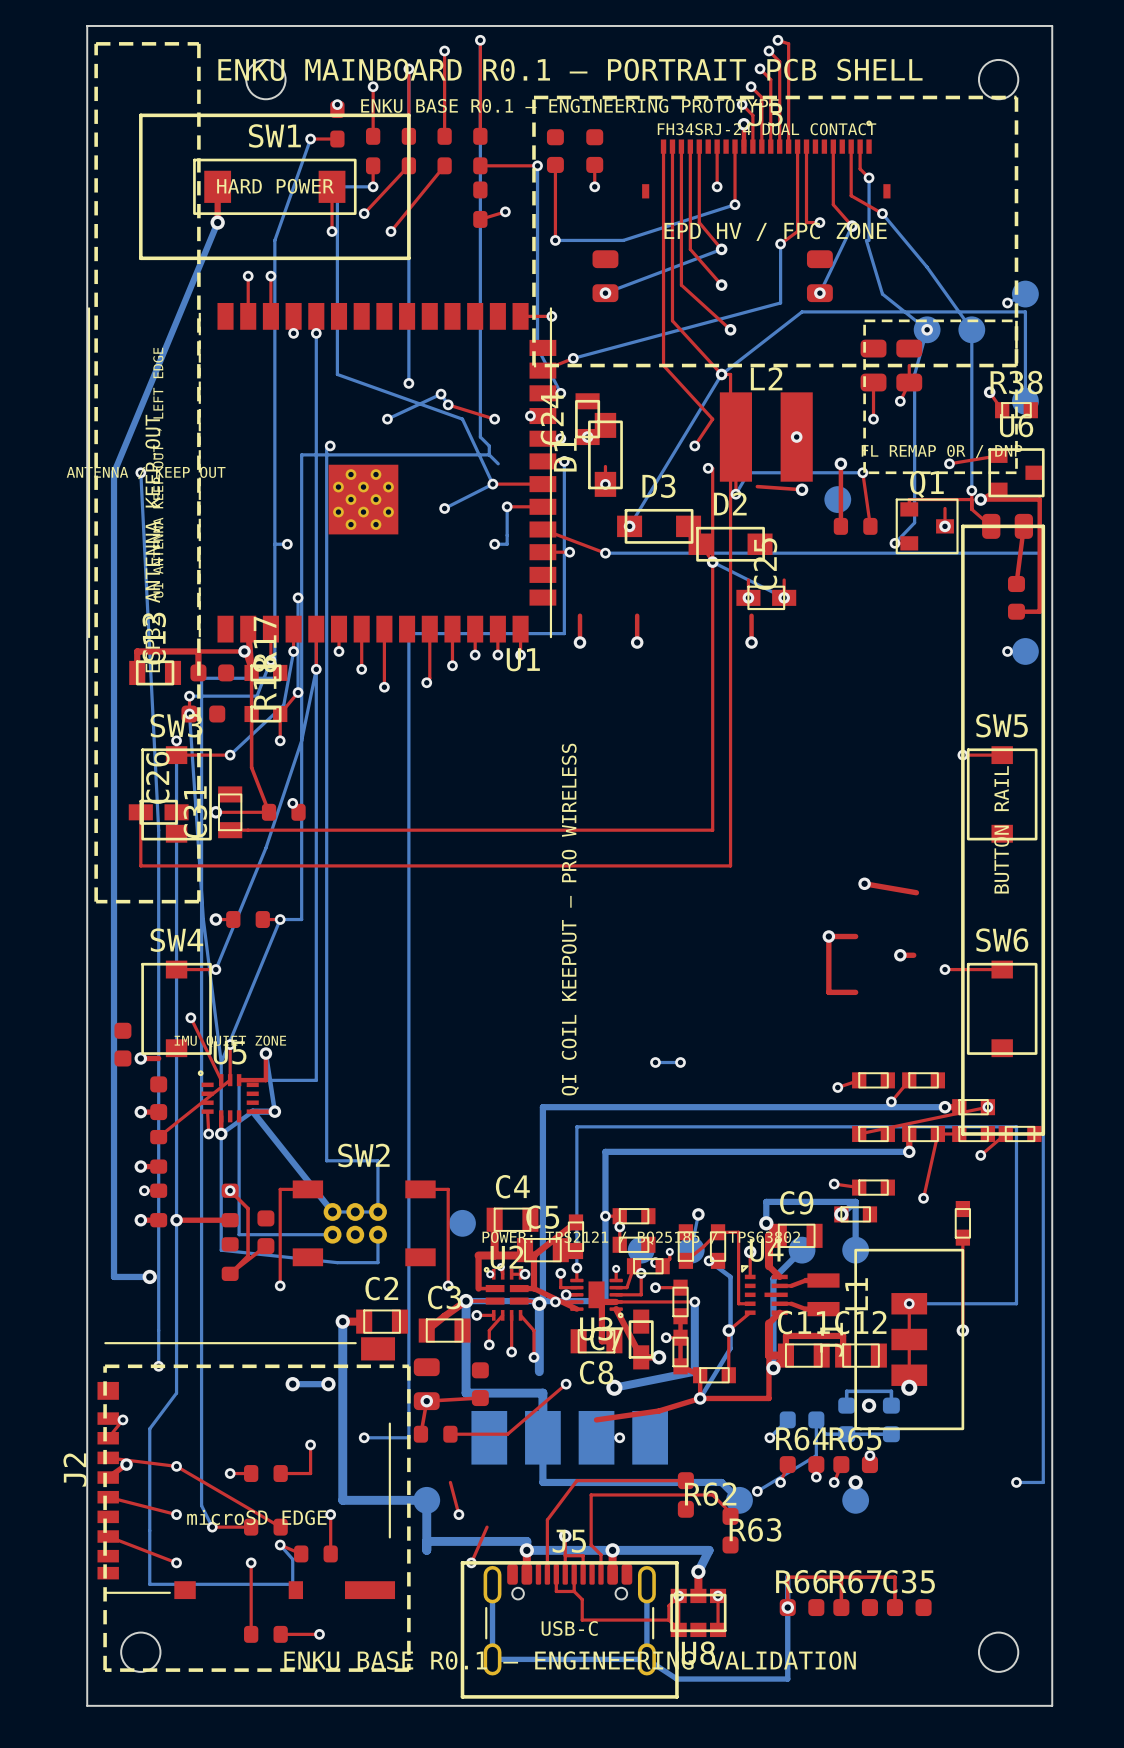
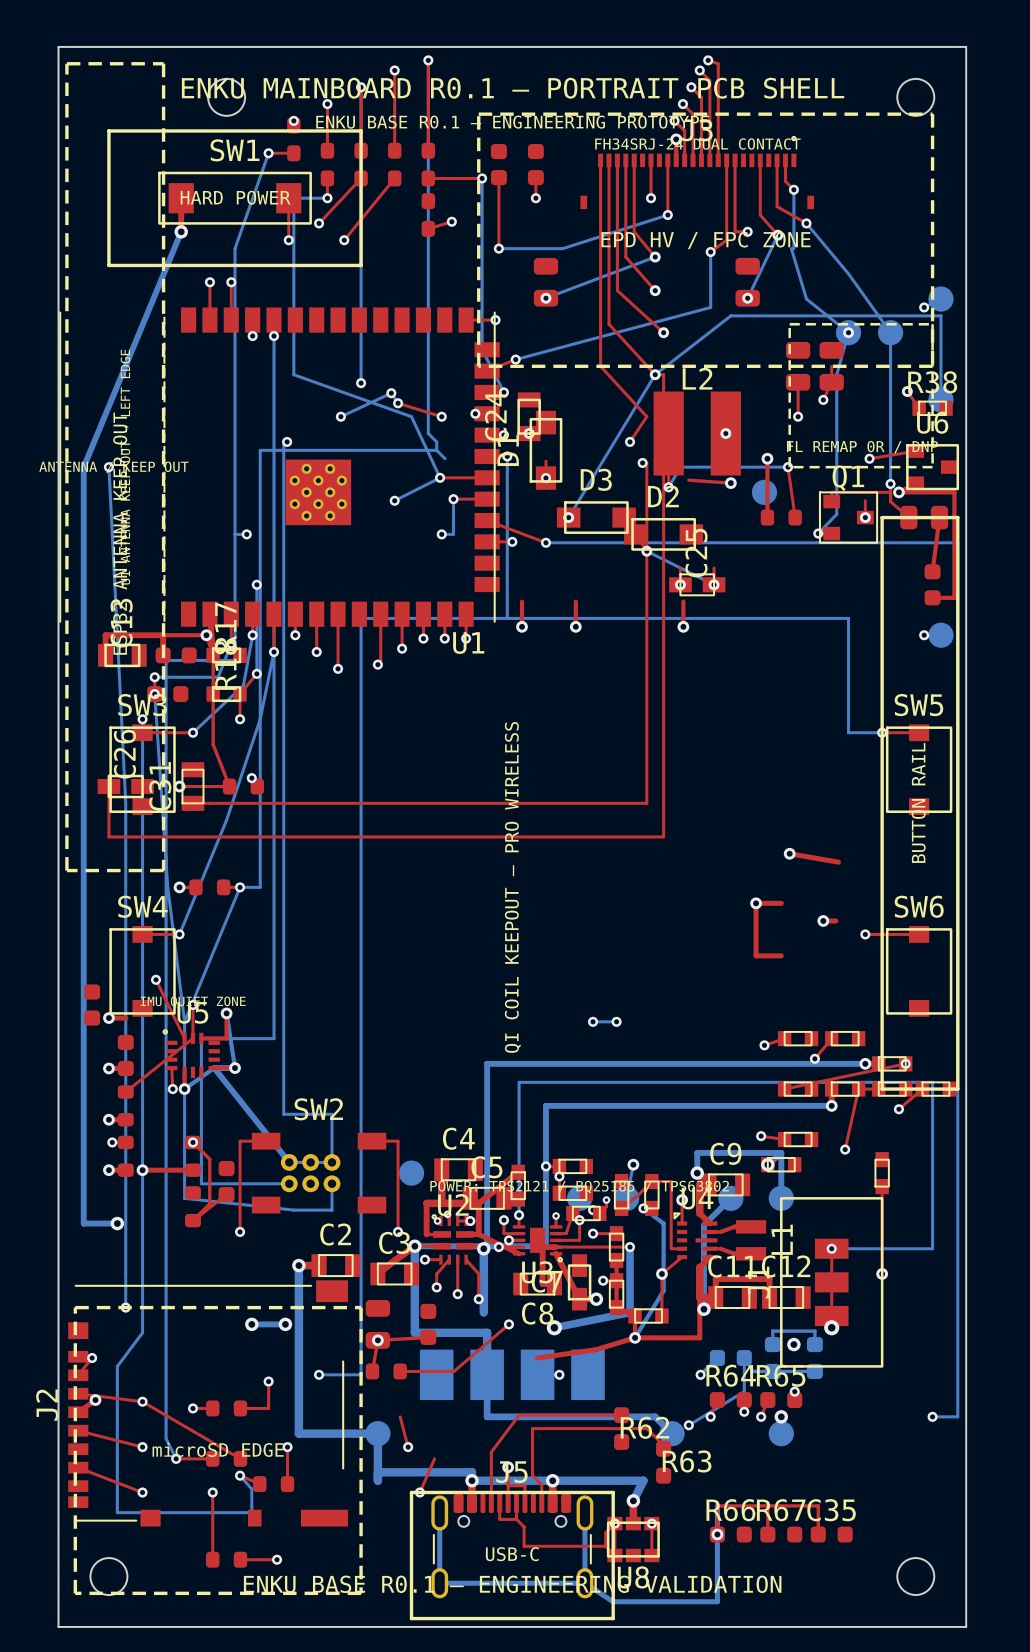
bottom track: none -> (507, 618) (848, 618) (848, 732) (882, 732)

